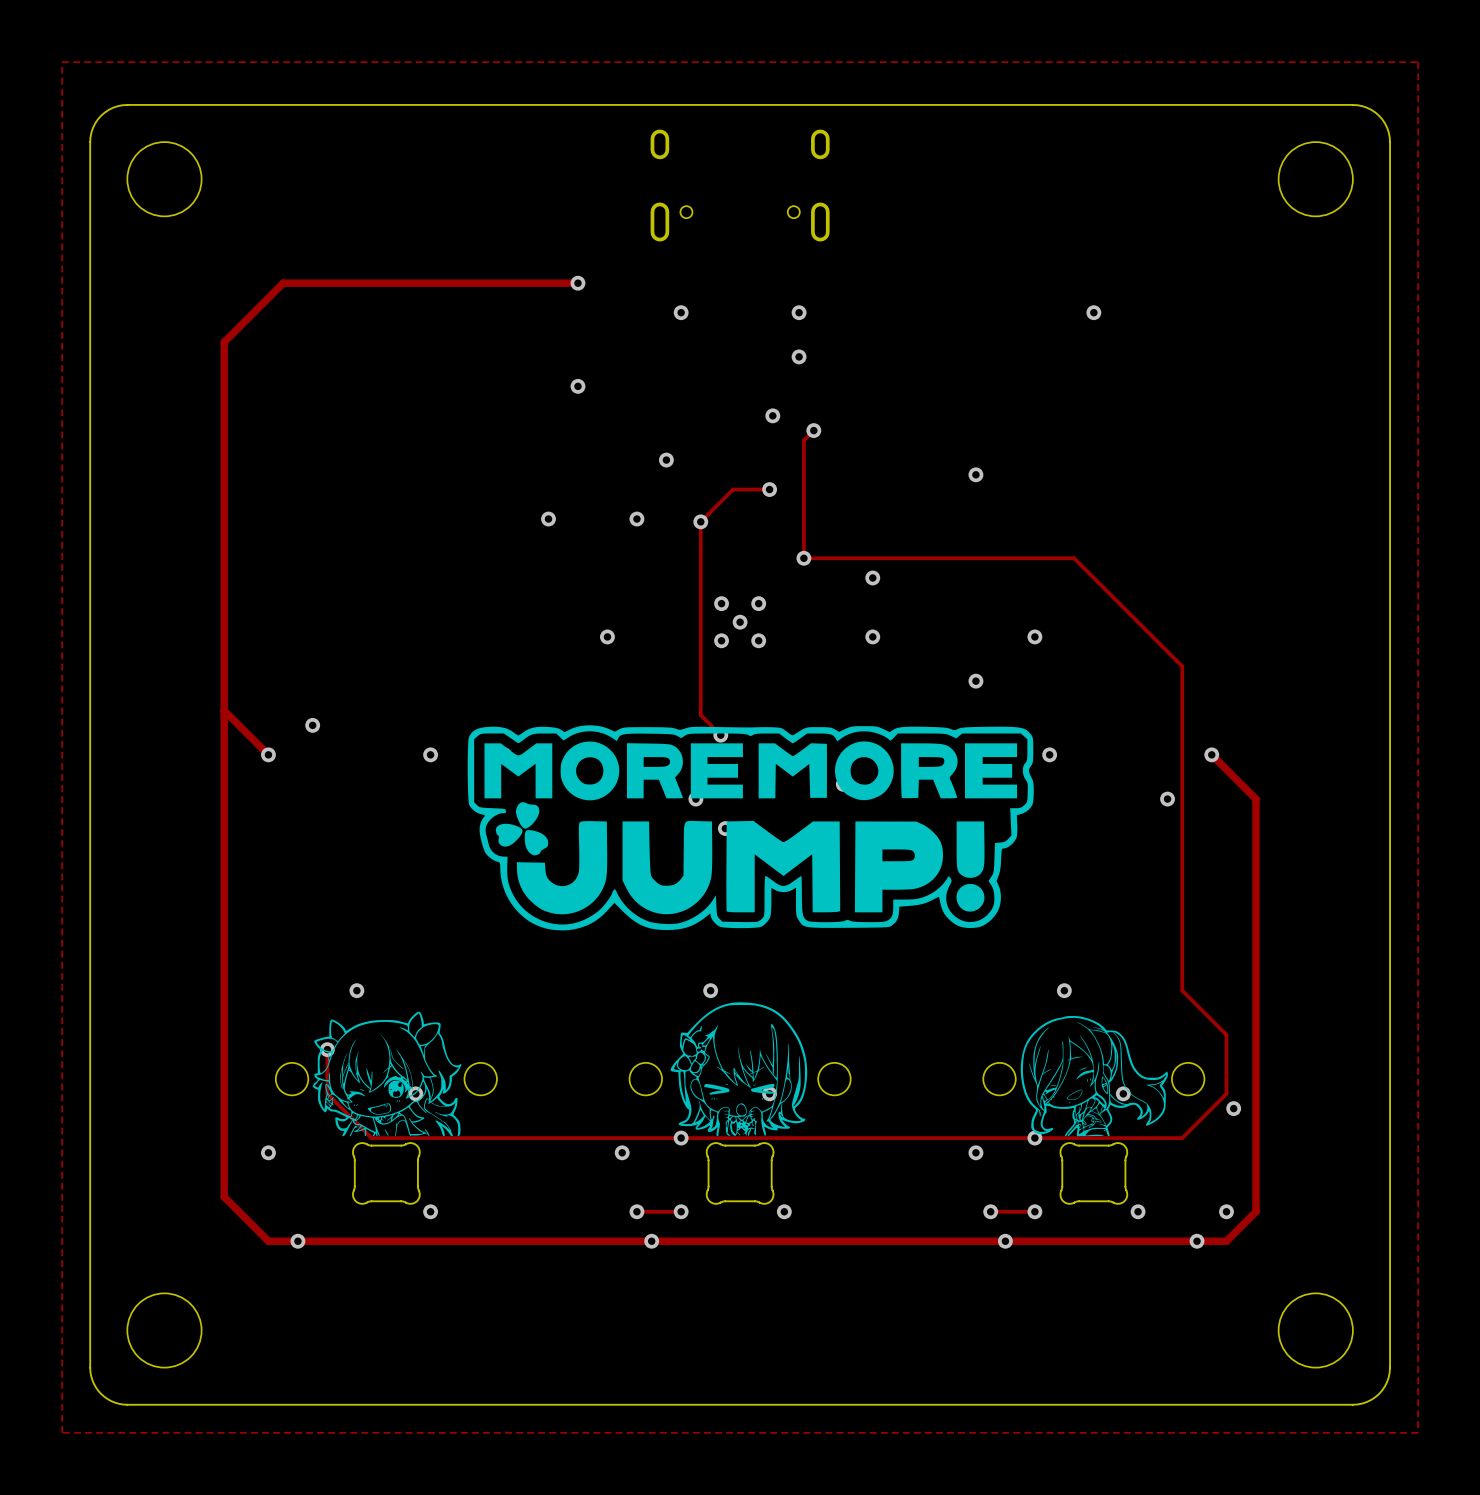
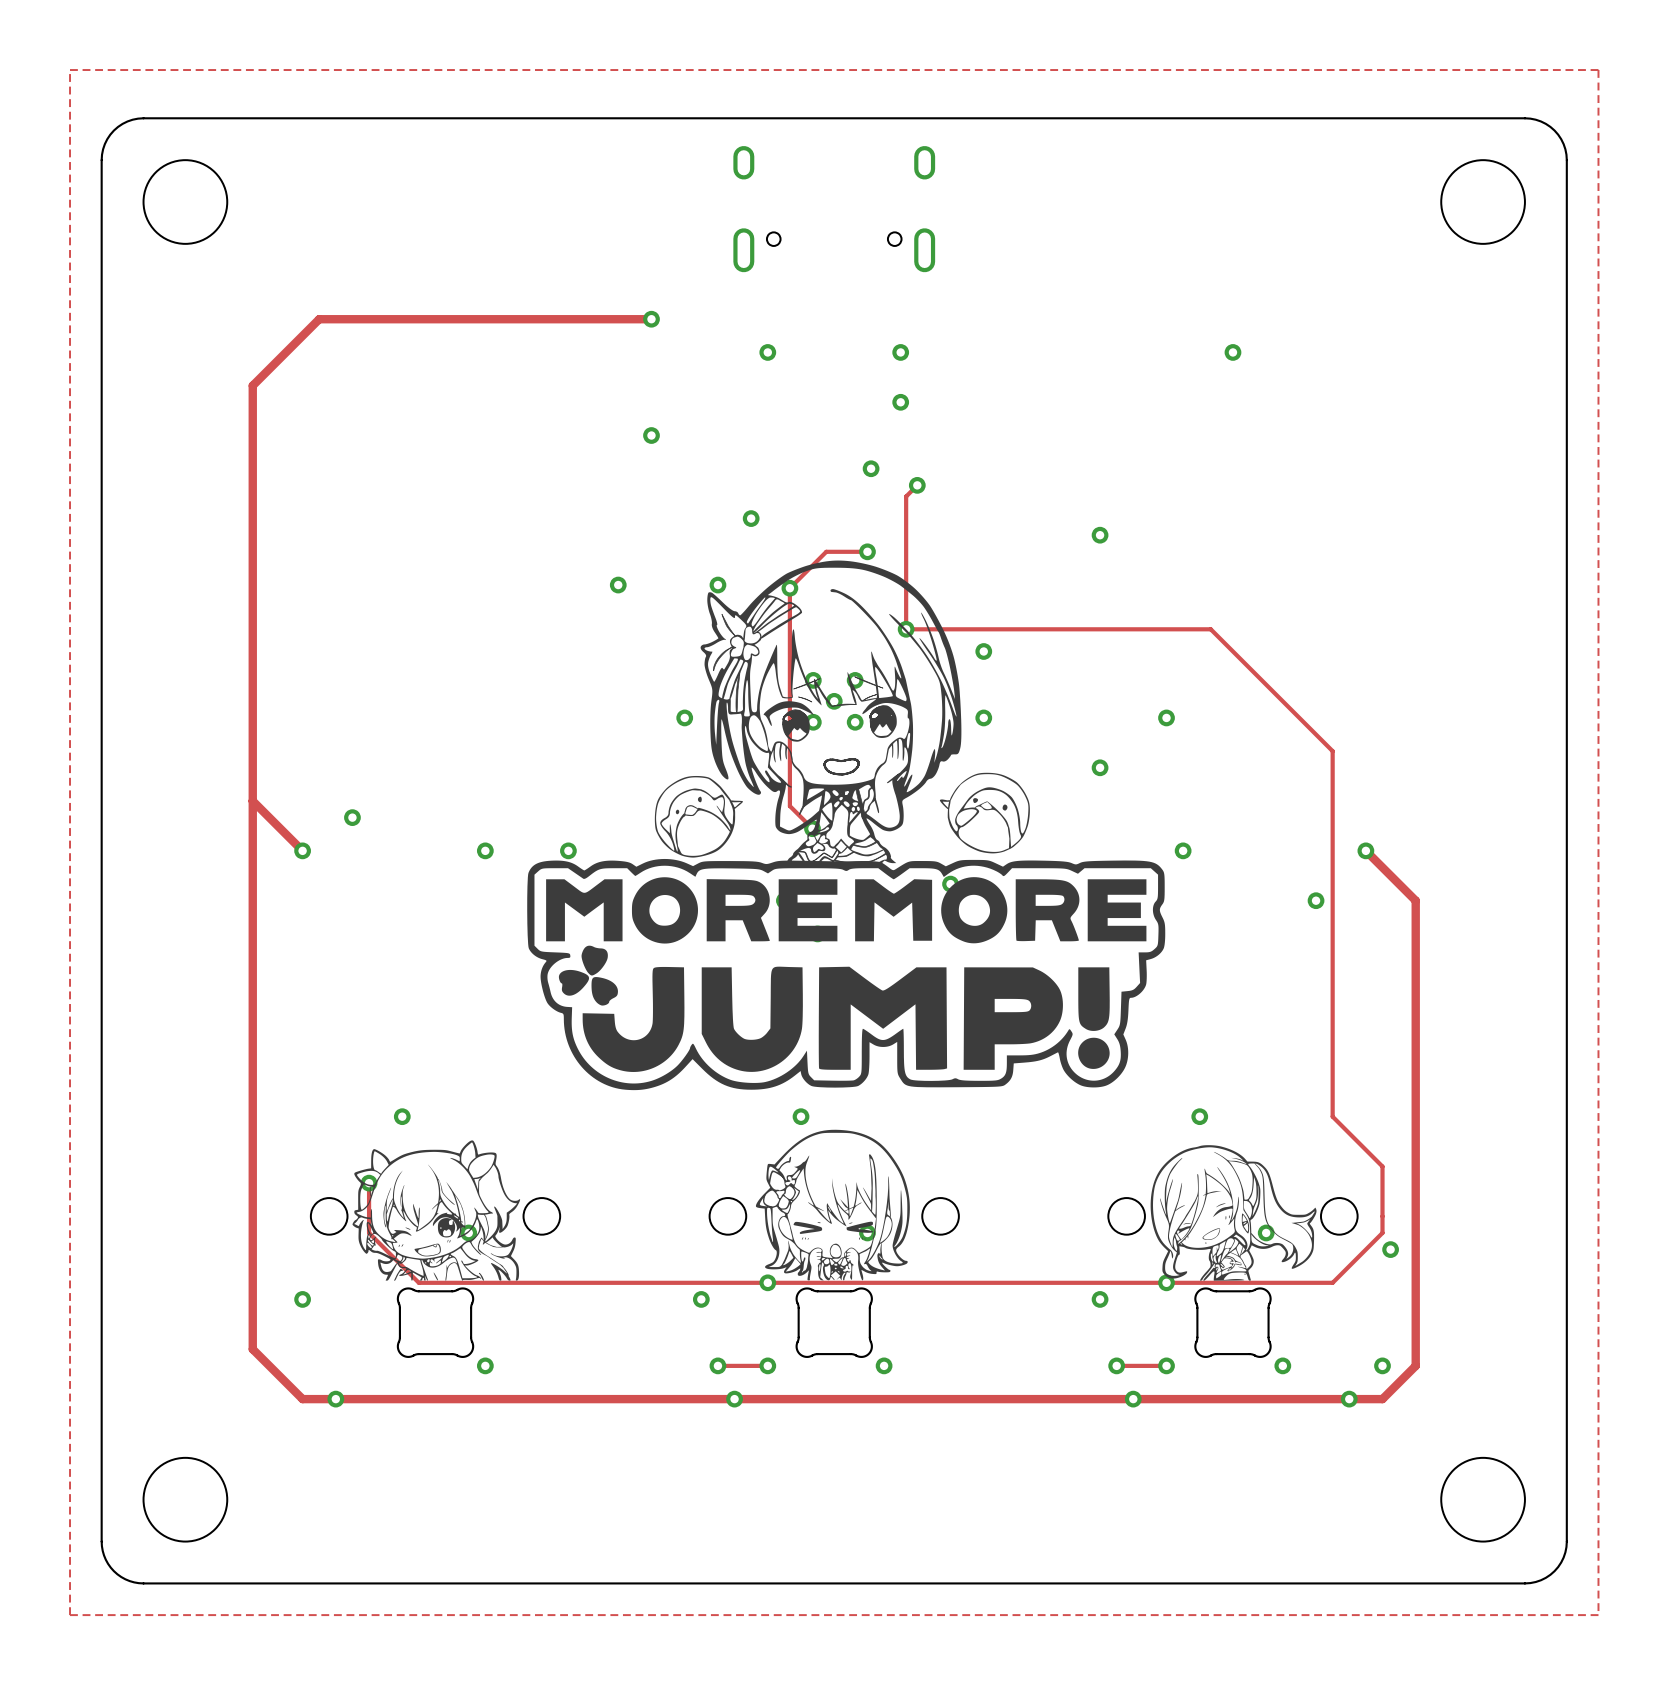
drawing: none -> [654, 560, 1030, 864]
line: none -> (804, 718) (805, 718)
line: none -> (785, 721) (787, 721)
line: none -> (855, 759) (828, 760)
line: none -> (824, 766) (825, 768)
line: none -> (857, 766) (855, 769)
line: none -> (829, 771) (840, 774) (851, 772)
drawing position: (518, 770) -> (584, 910)
drawing position: (589, 770) -> (664, 910)
drawing position: (654, 770) -> (738, 910)
drawing position: (716, 770) -> (808, 910)
drawing position: (792, 770) -> (893, 910)
drawing position: (864, 770) -> (974, 910)
drawing position: (929, 770) -> (1047, 910)
drawing position: (991, 770) -> (1117, 910)
drawing position: (527, 815) -> (594, 960)
drawing position: (750, 827) -> (846, 974)
drawing position: (509, 835) -> (573, 982)
drawing position: (536, 842) -> (604, 991)
drawing position: (970, 849) -> (1094, 999)
drawing position: (783, 866) -> (882, 1018)
drawing position: (898, 866) -> (1013, 1018)
drawing position: (562, 867) -> (633, 1019)
drawing position: (667, 867) -> (752, 1019)
drawing position: (970, 897) -> (1093, 1053)

